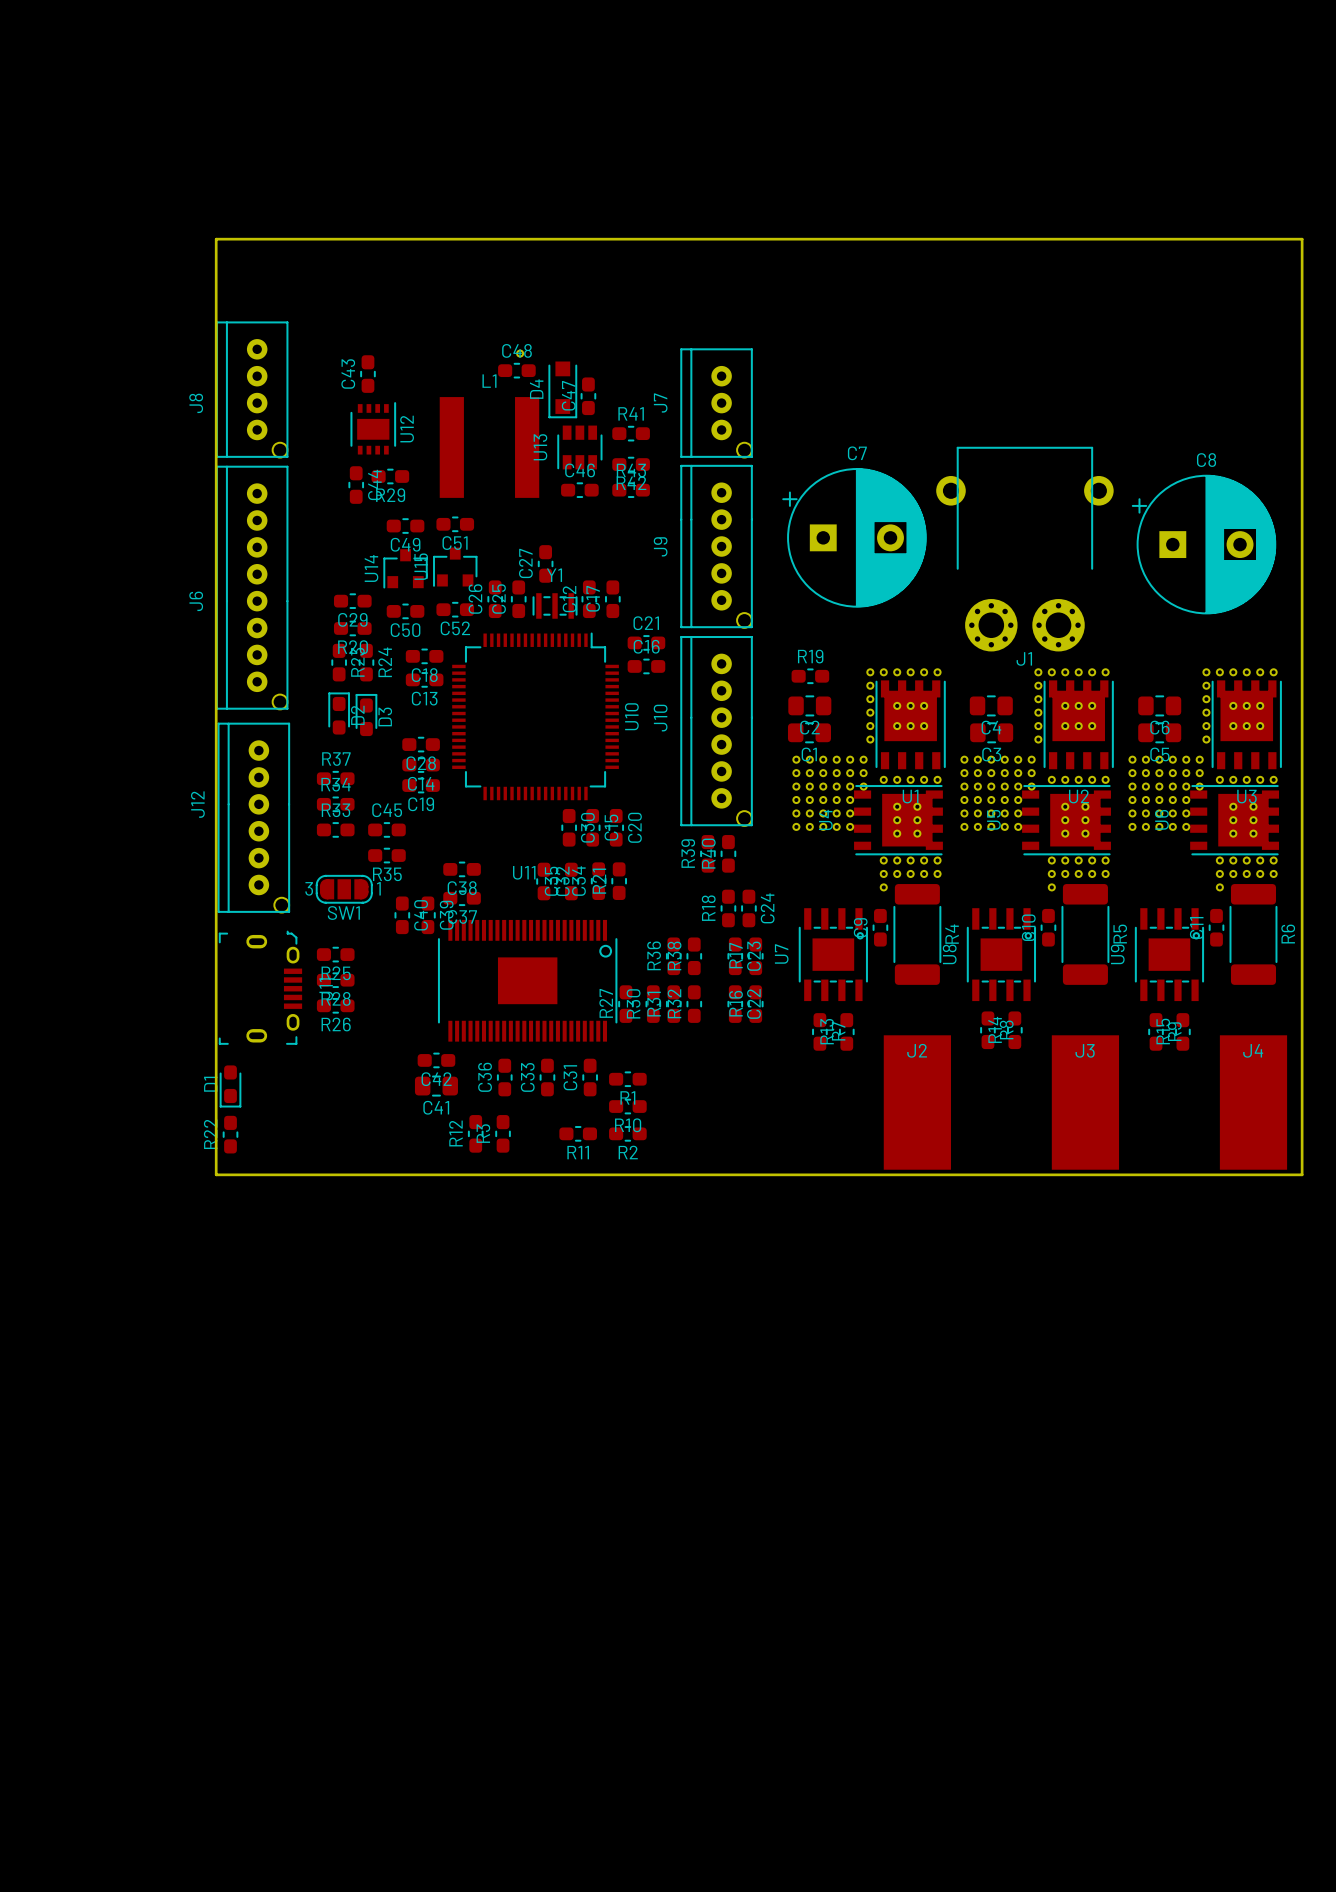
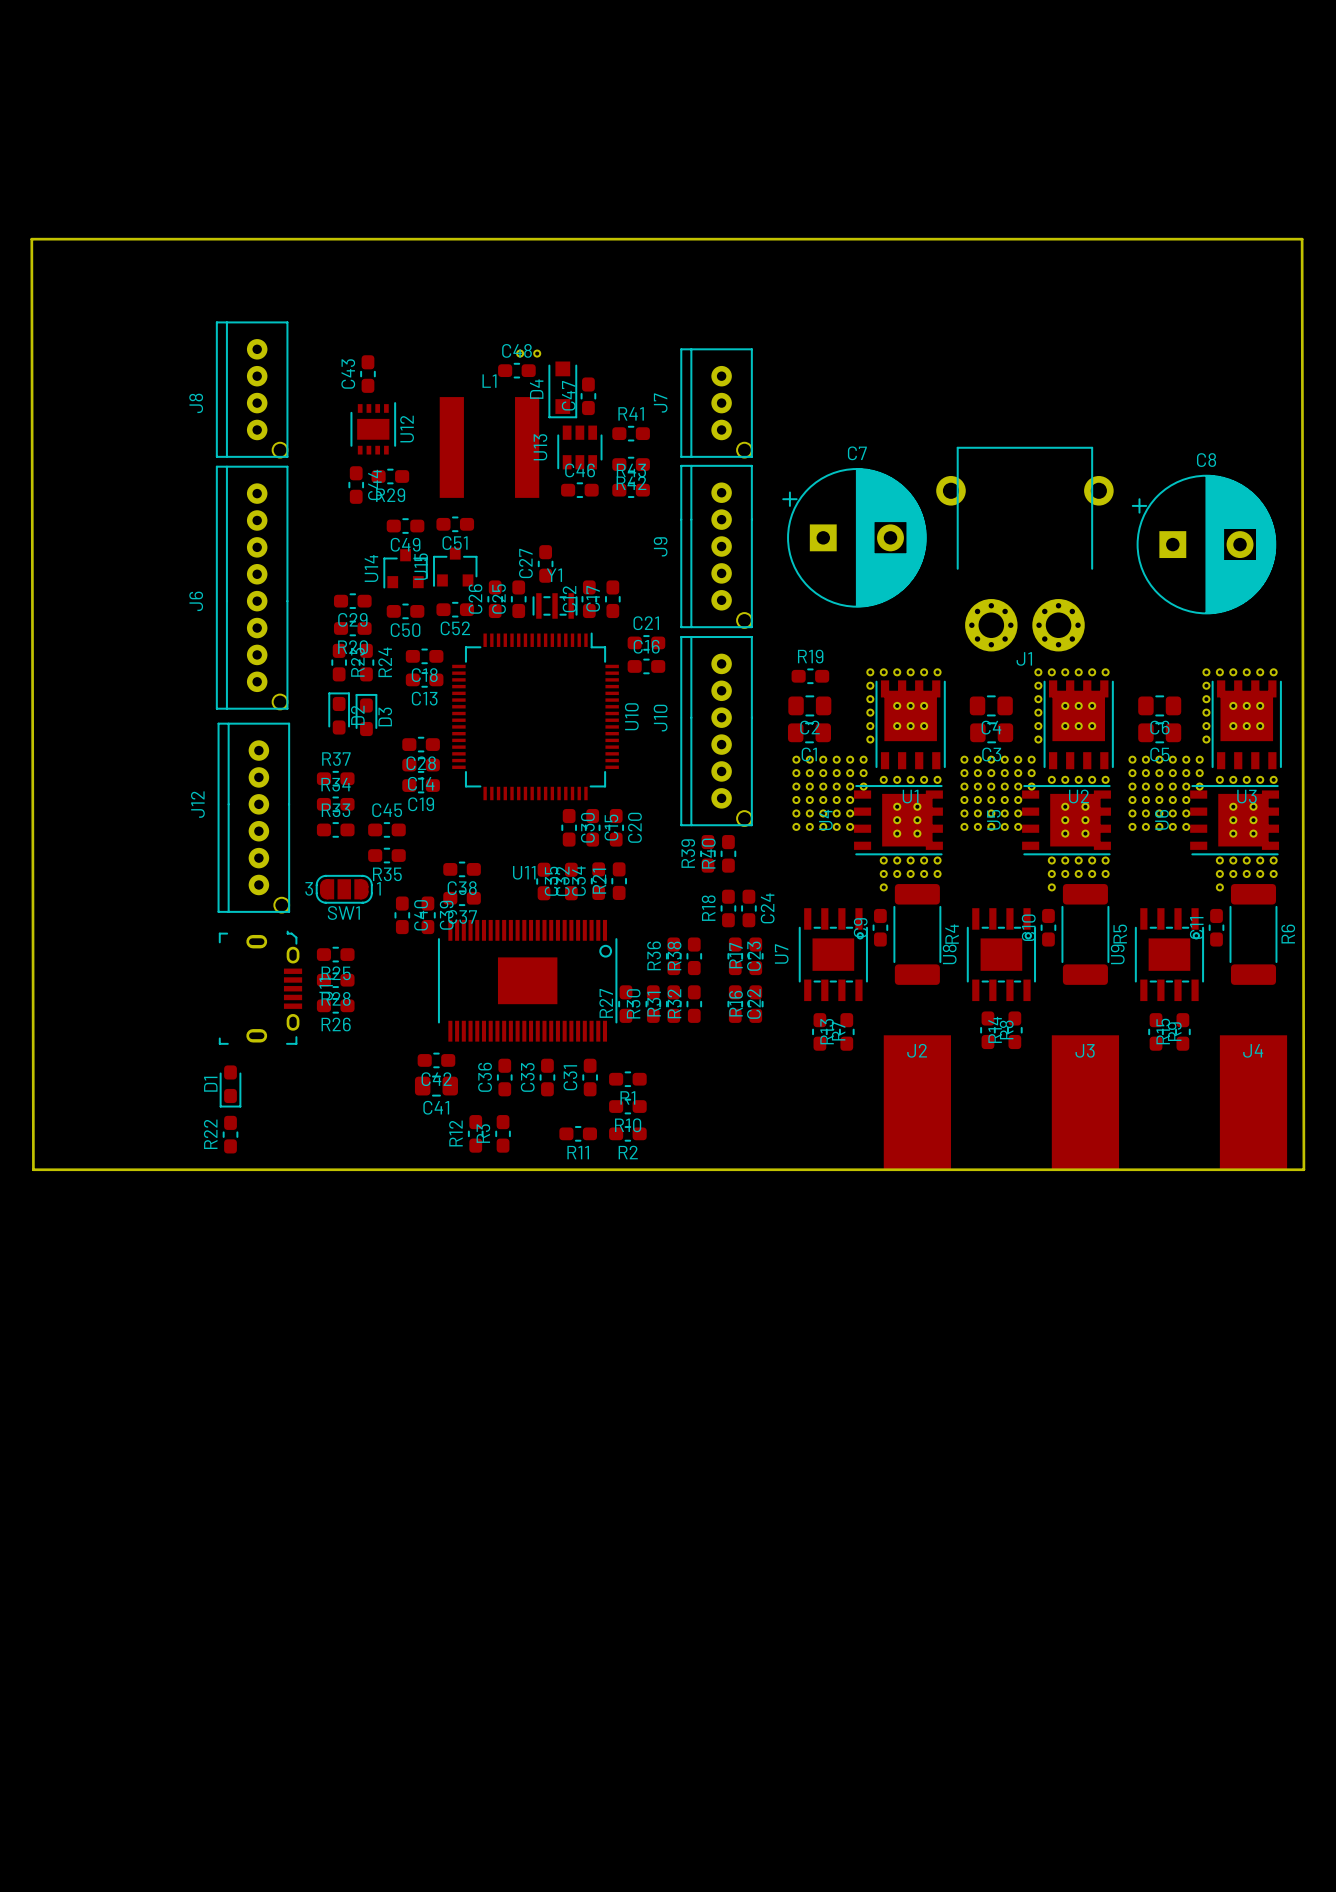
board edge: (216, 239) (216, 1174) (1302, 1174) (1302, 239) -> (216, 239) (31, 239) (33, 1169) (1303, 1169) (1302, 239)
part: none -> (537, 353)

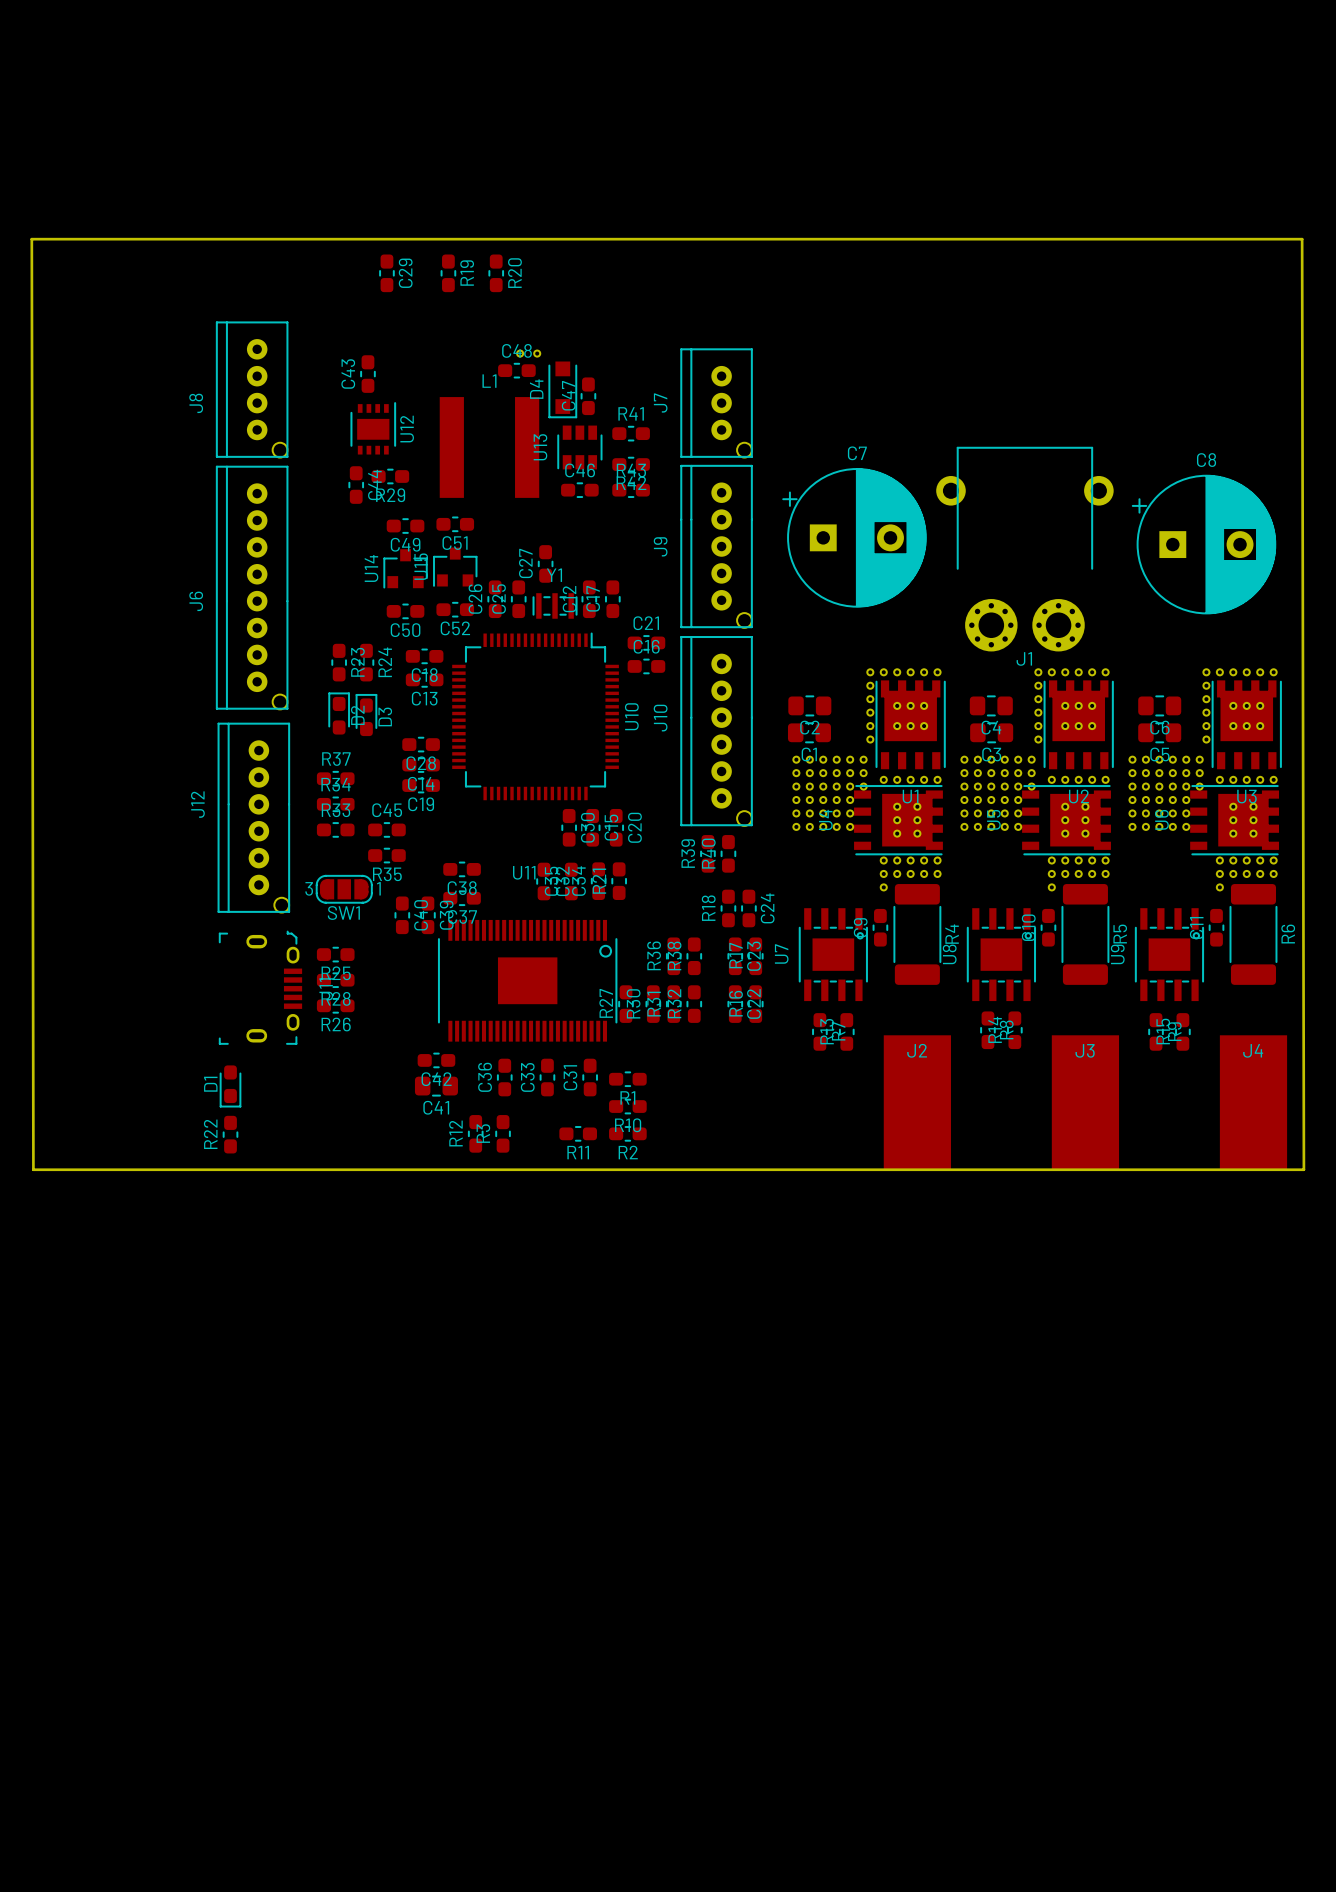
C29 rotation: 0° (352, 601) -> 90° clockwise (386, 273)
C29 position: (352, 601) -> (386, 273)
C29 name position: C29 (352, 619) -> C29 (405, 273)
R20 rotation: 0° (352, 628) -> 90° clockwise (496, 273)
R20 position: (352, 628) -> (496, 273)
R20 name position: R20 (353, 647) -> R20 (514, 273)
R19 rotation: 0° (810, 676) -> 90° clockwise (448, 273)
R19 position: (810, 676) -> (448, 273)

